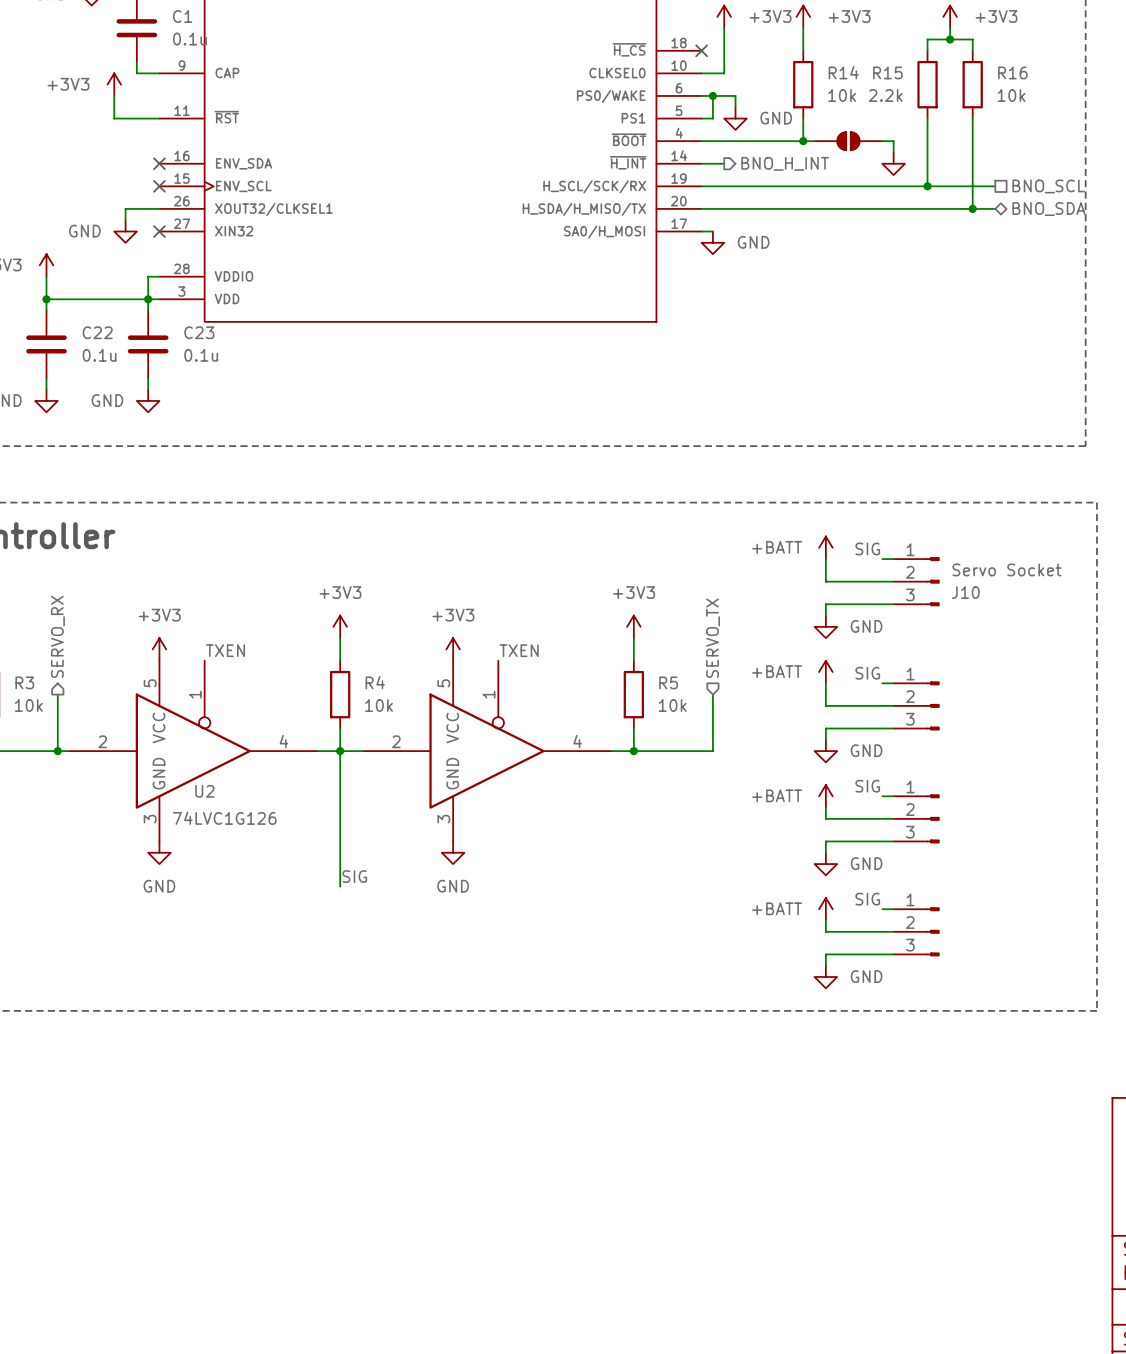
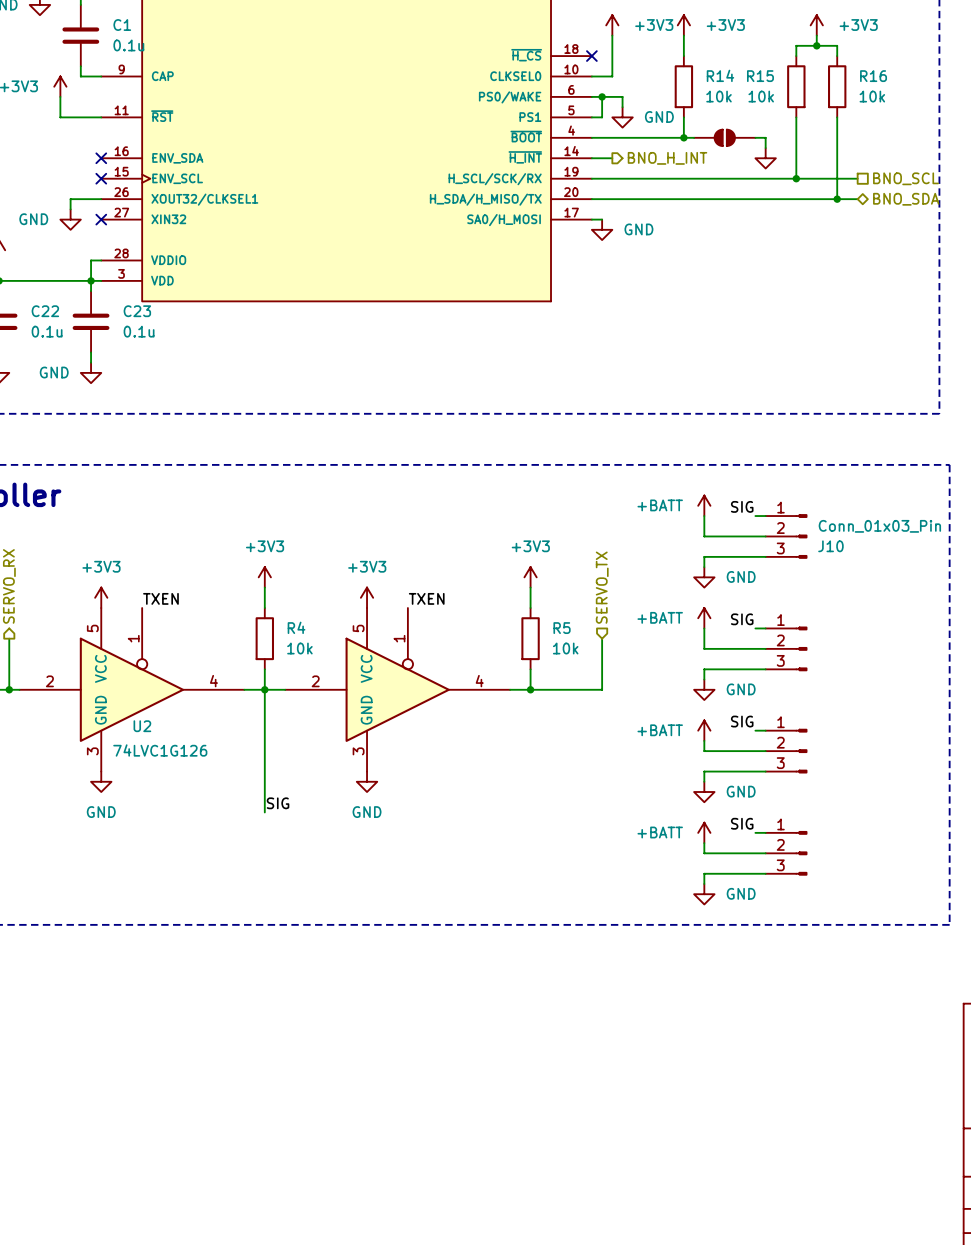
R15 value: 2.2k (885, 95) -> 10k (761, 96)
J10 value: Servo Socket (1006, 569) -> Conn_01x03_Pin (879, 526)

